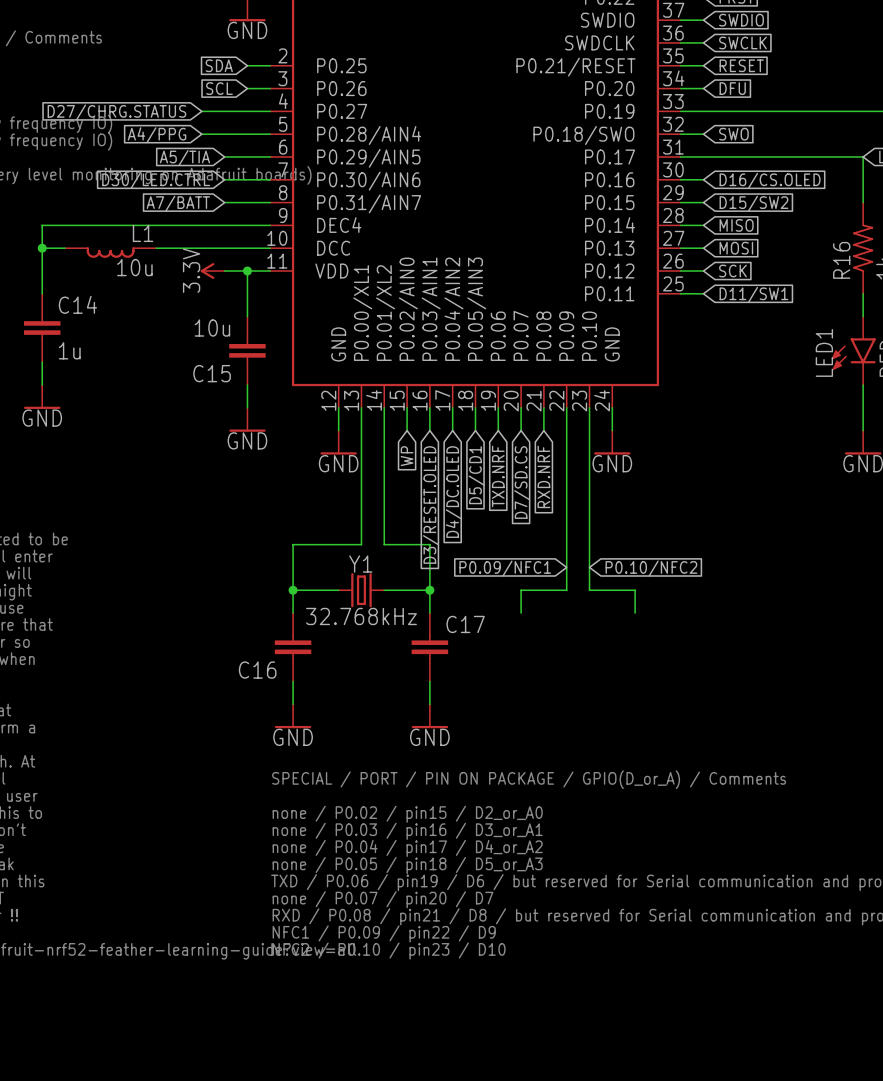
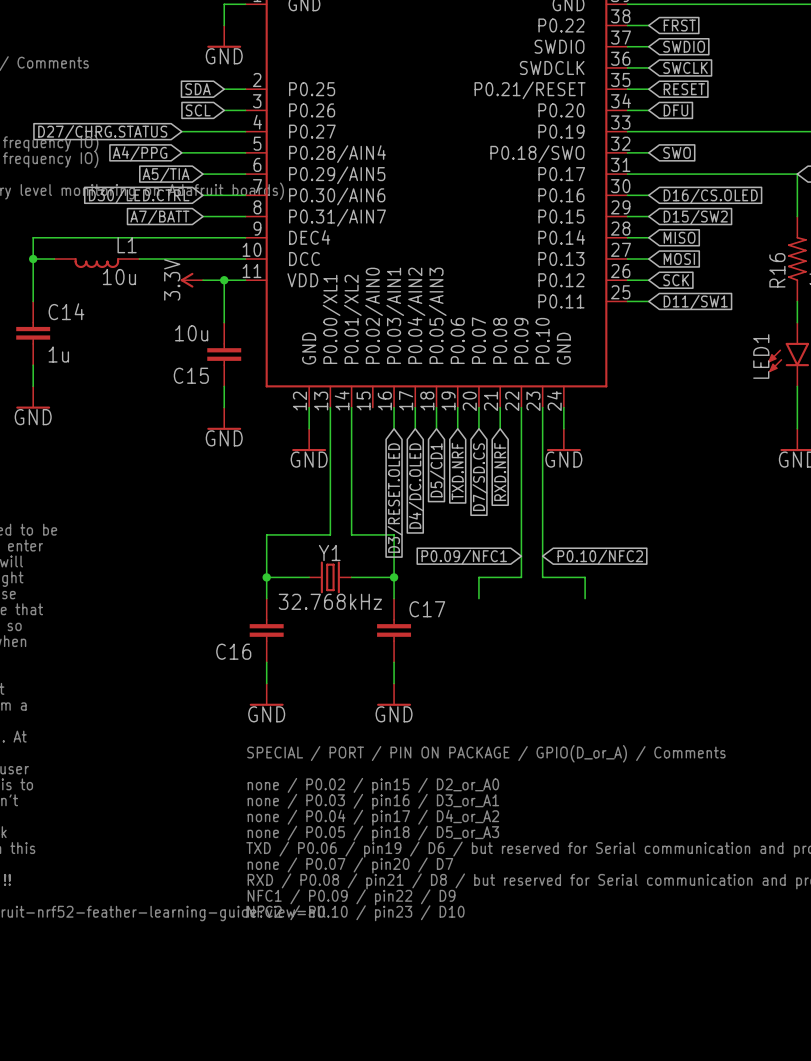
wire: (407, 407) (407, 430) -> none
global label: WP (407, 456) -> none

